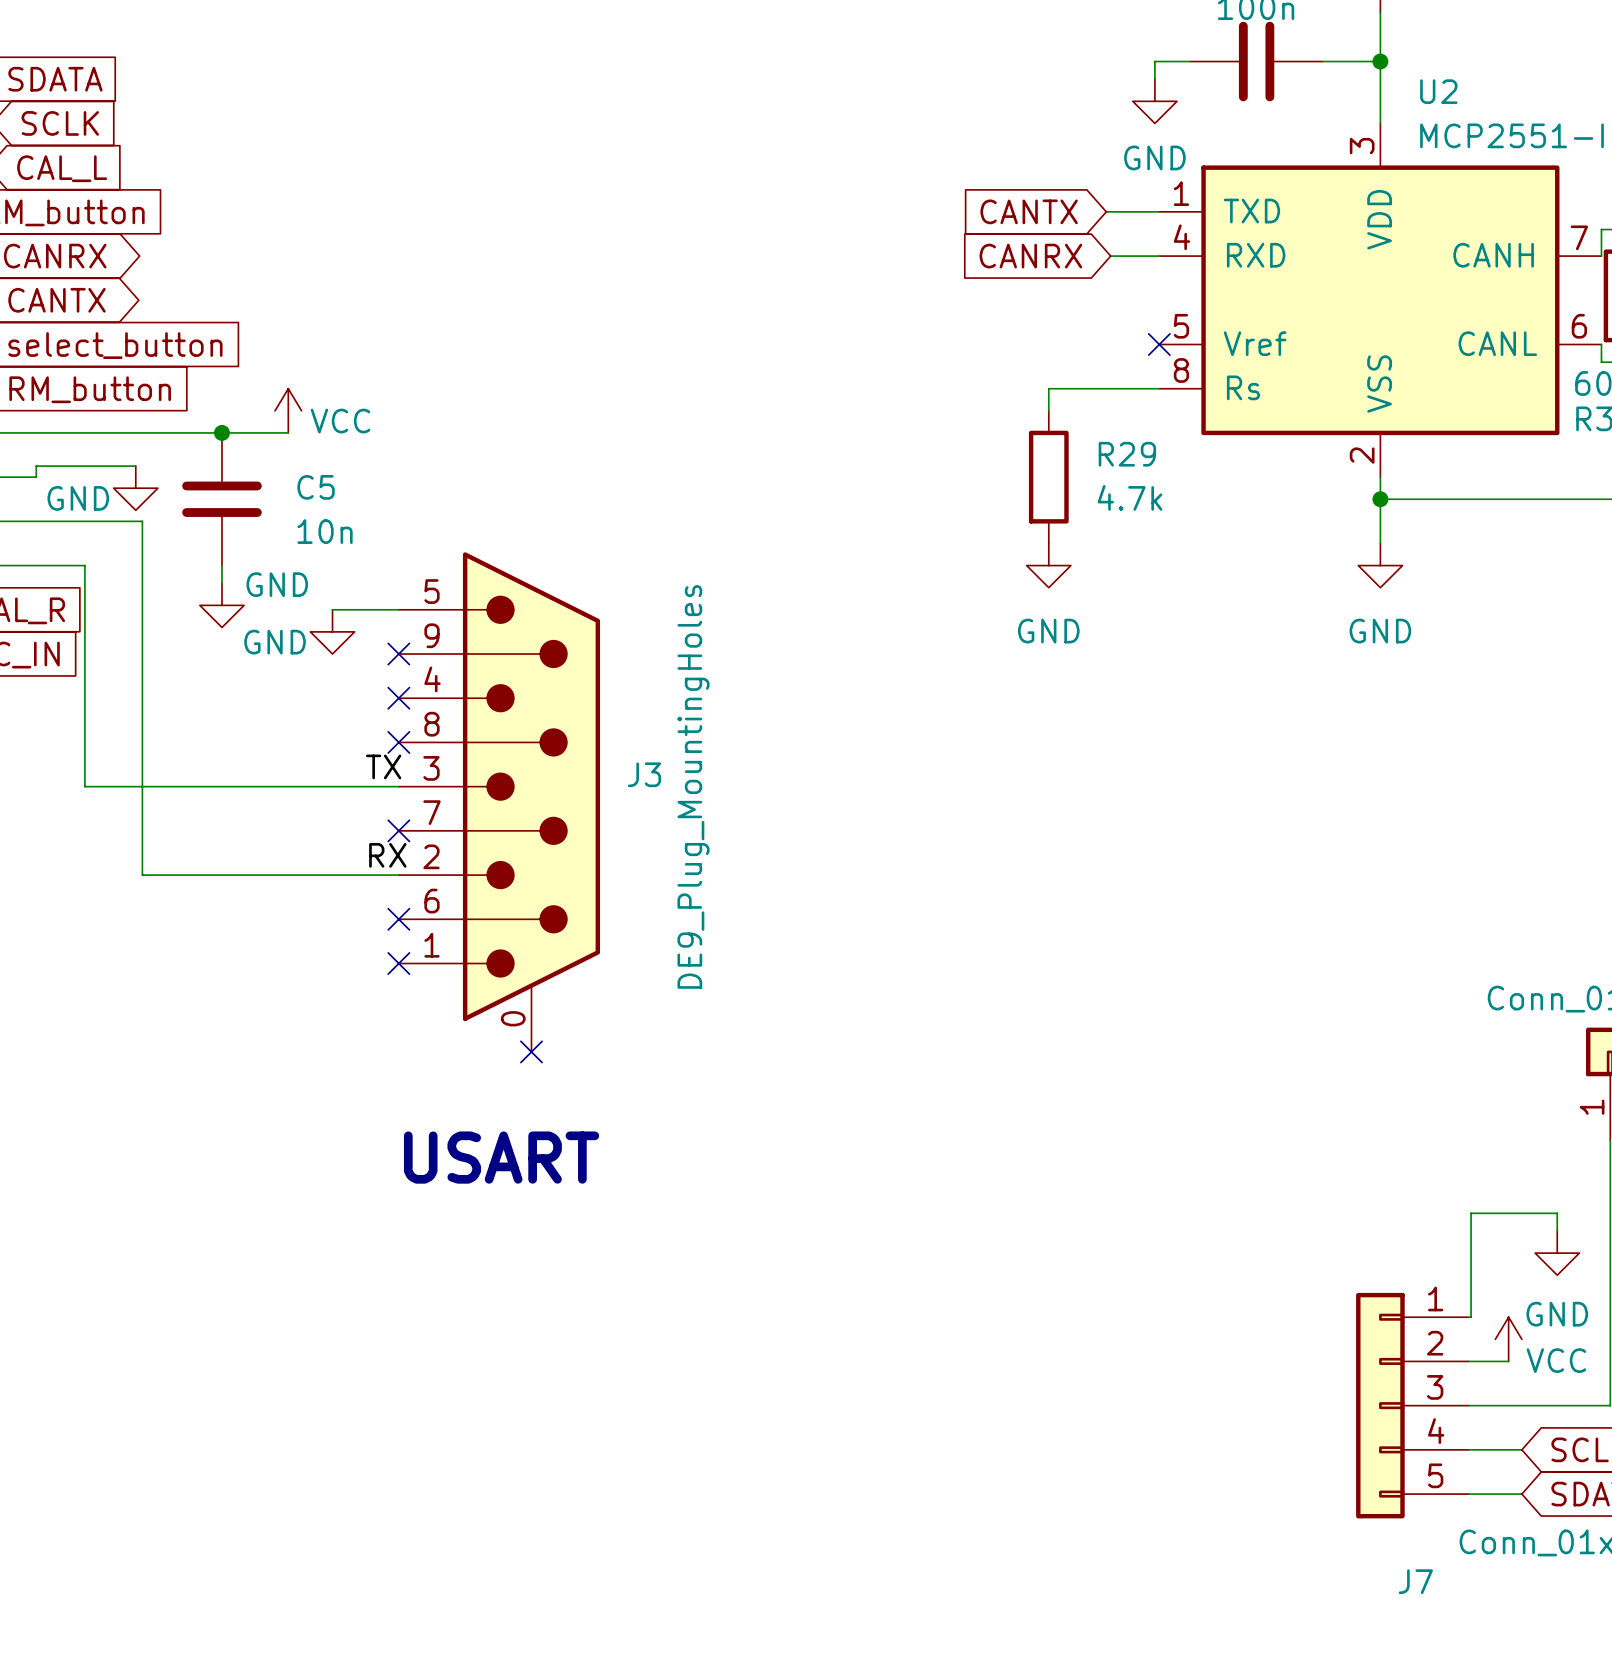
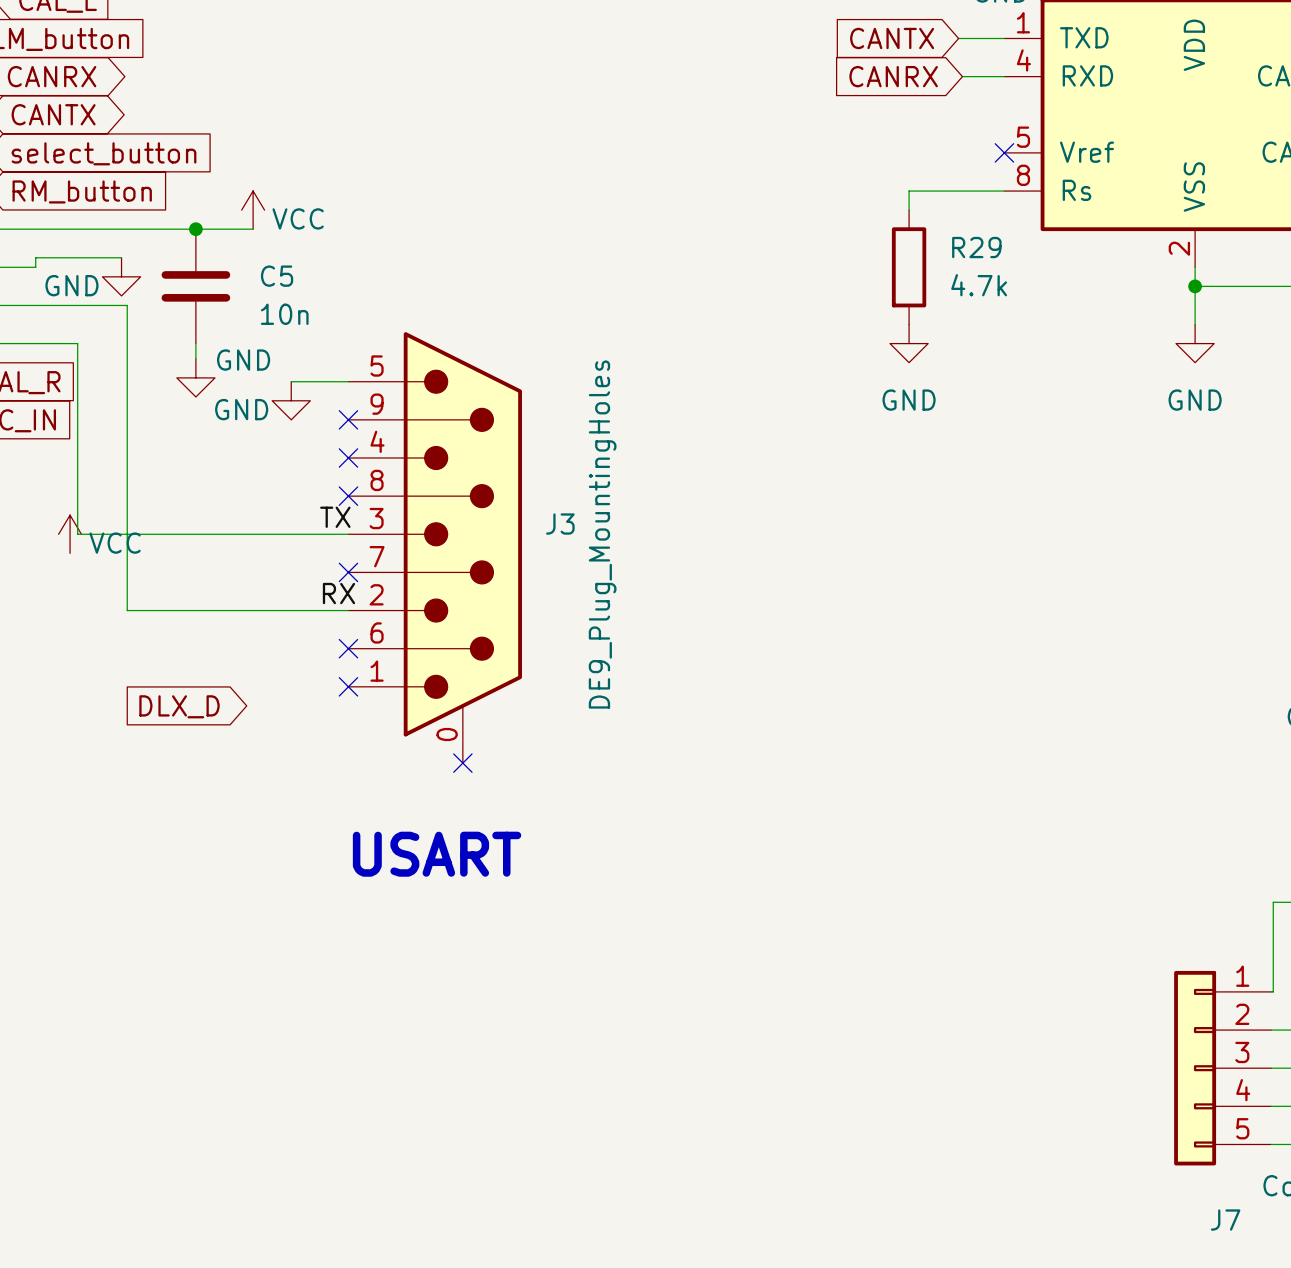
power symbol: none -> VCC (70, 534)
global label: none -> DLX_D (179, 706)

